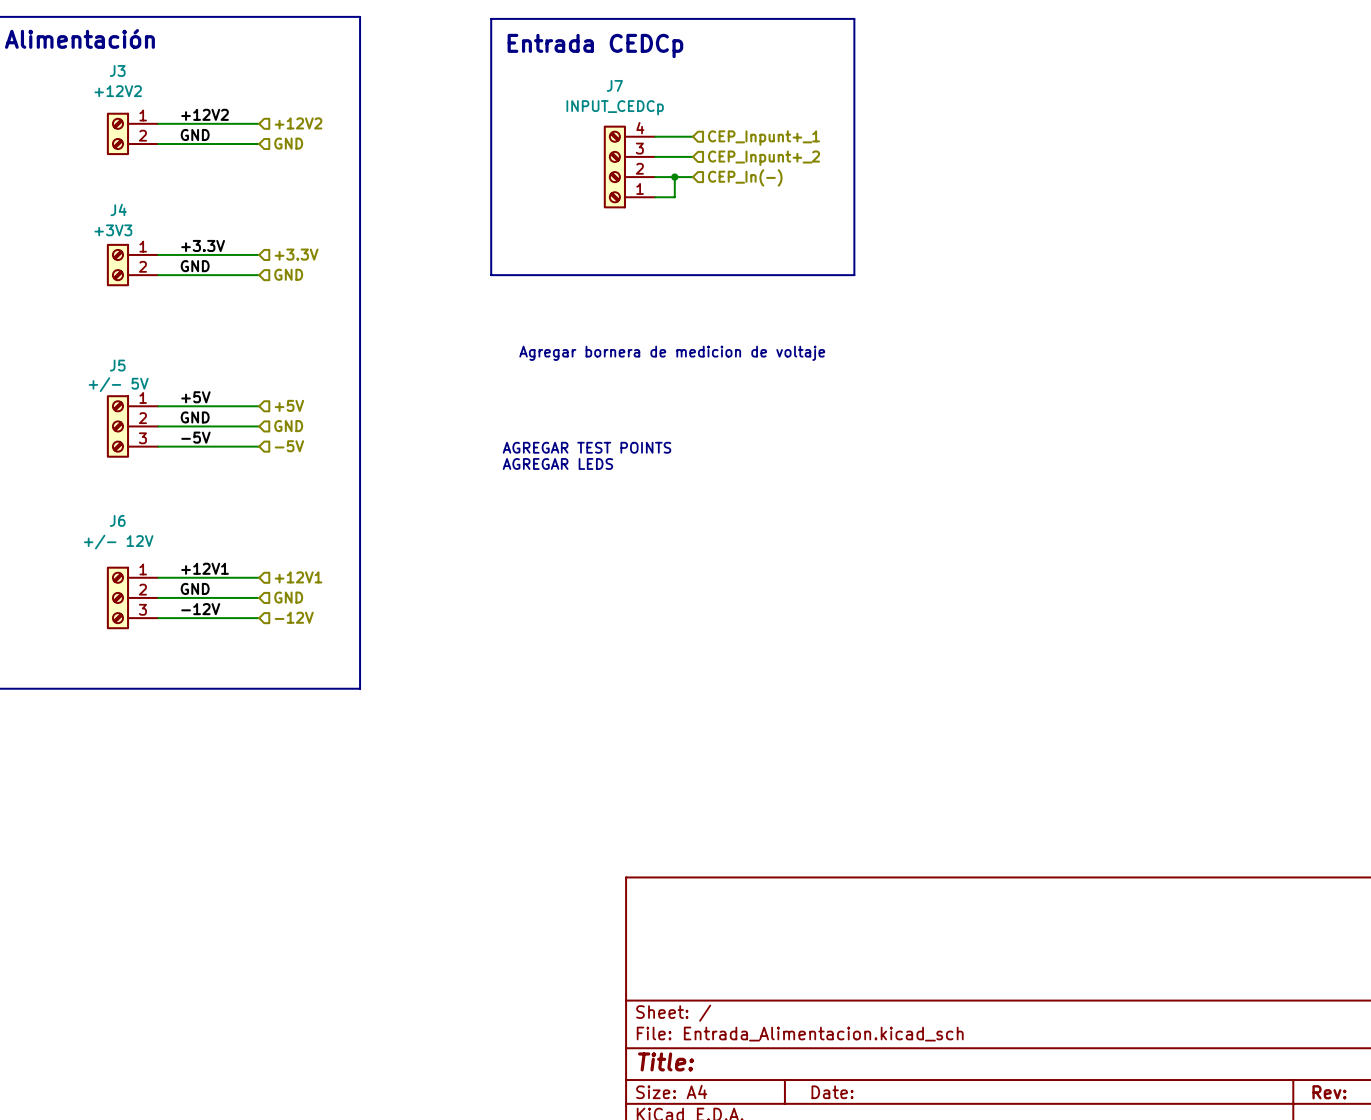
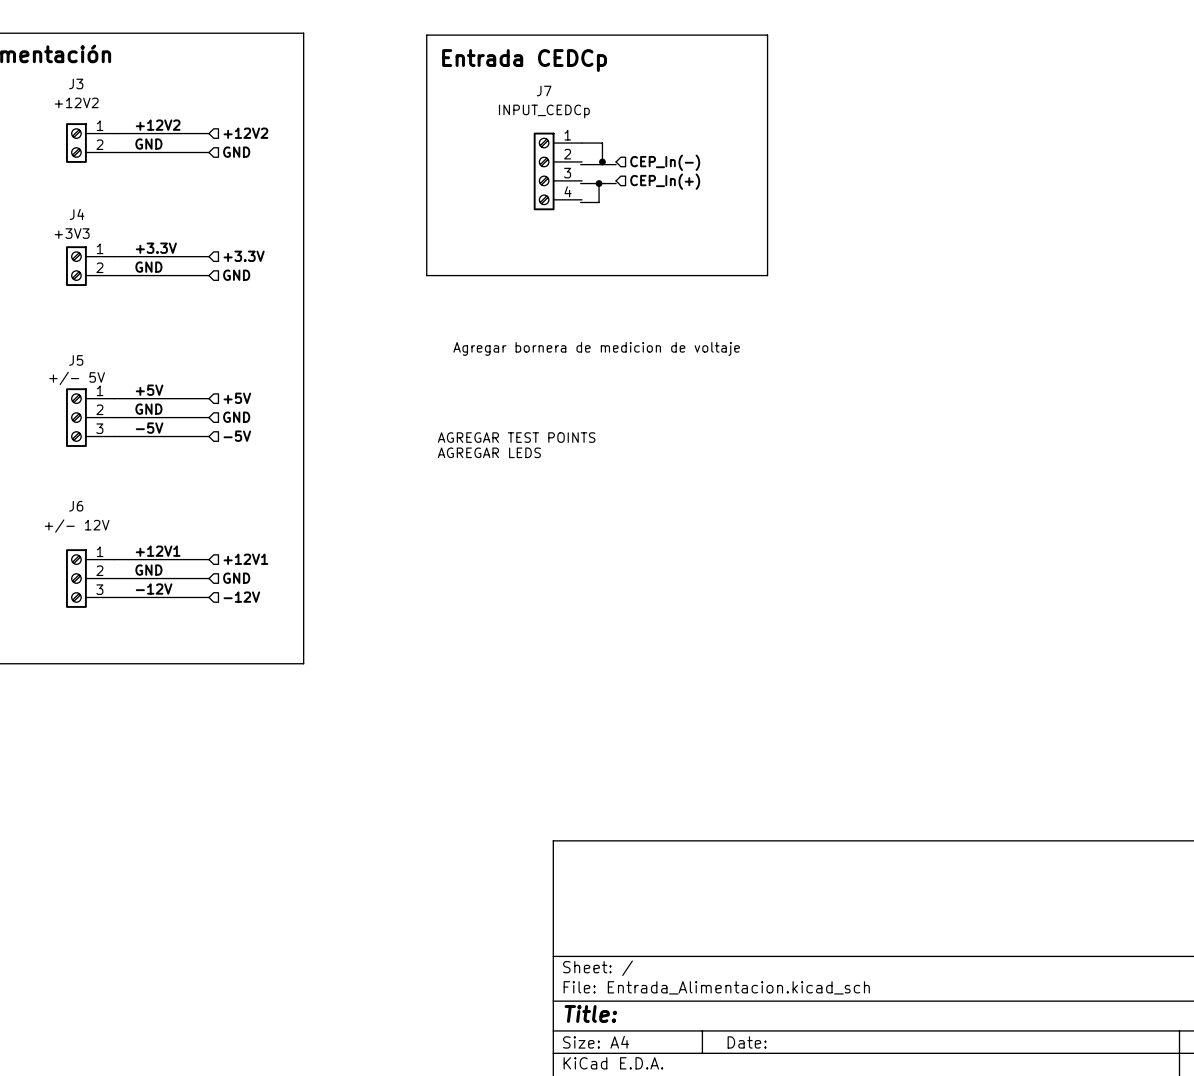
wire: none -> (581, 143) (602, 143) (602, 161)
wire: (655, 136) (692, 136) -> none
hierarchical label: CEP_Inpunt+_1 (764, 138) -> none
junction: none -> (602, 161)
hierarchical label: CEP_Inpunt+_2 (764, 158) -> CEP_In(-) (665, 162)
J7 flip: as is (614, 167) -> up-down (544, 171)
hierarchical label: CEP_In(-) (745, 177) -> CEP_In(+) (665, 181)

